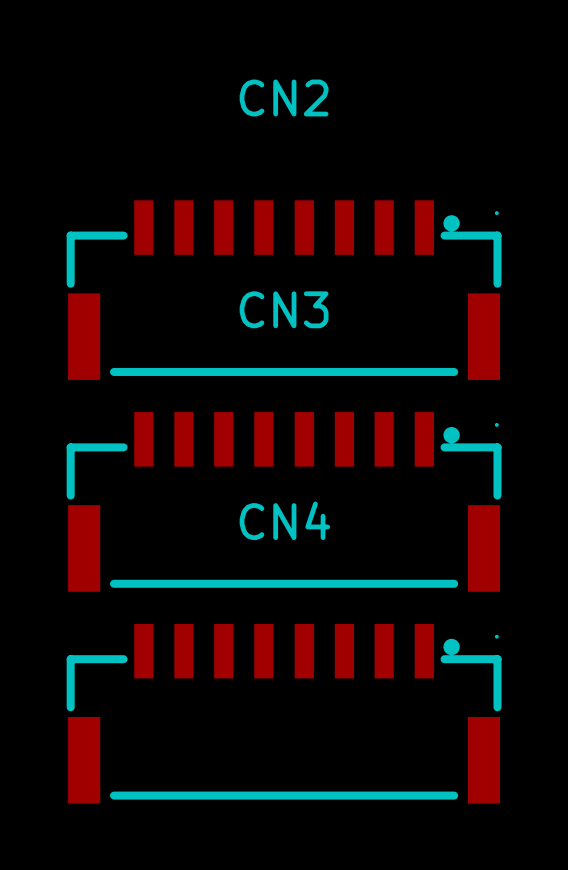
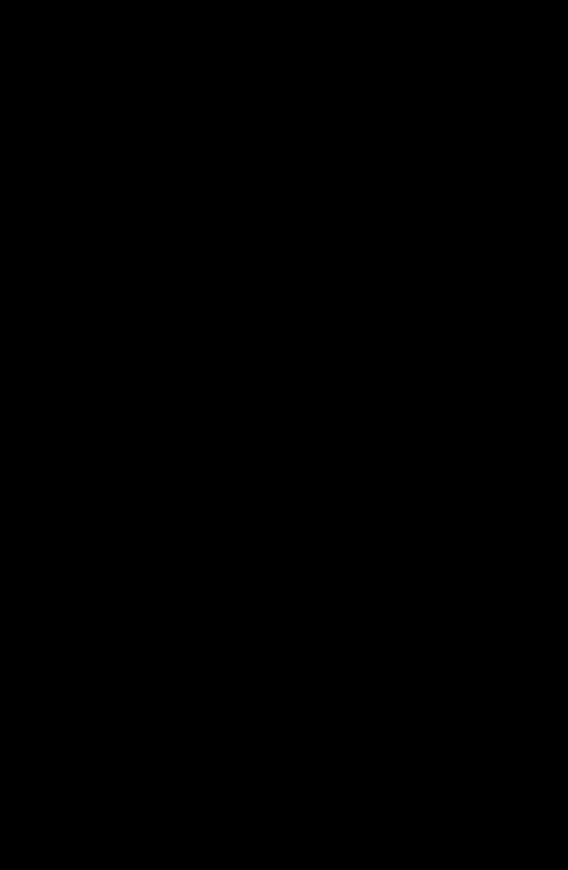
CN2: (284, 290) -> none
CN3: (284, 501) -> none
CN4: (284, 713) -> none

